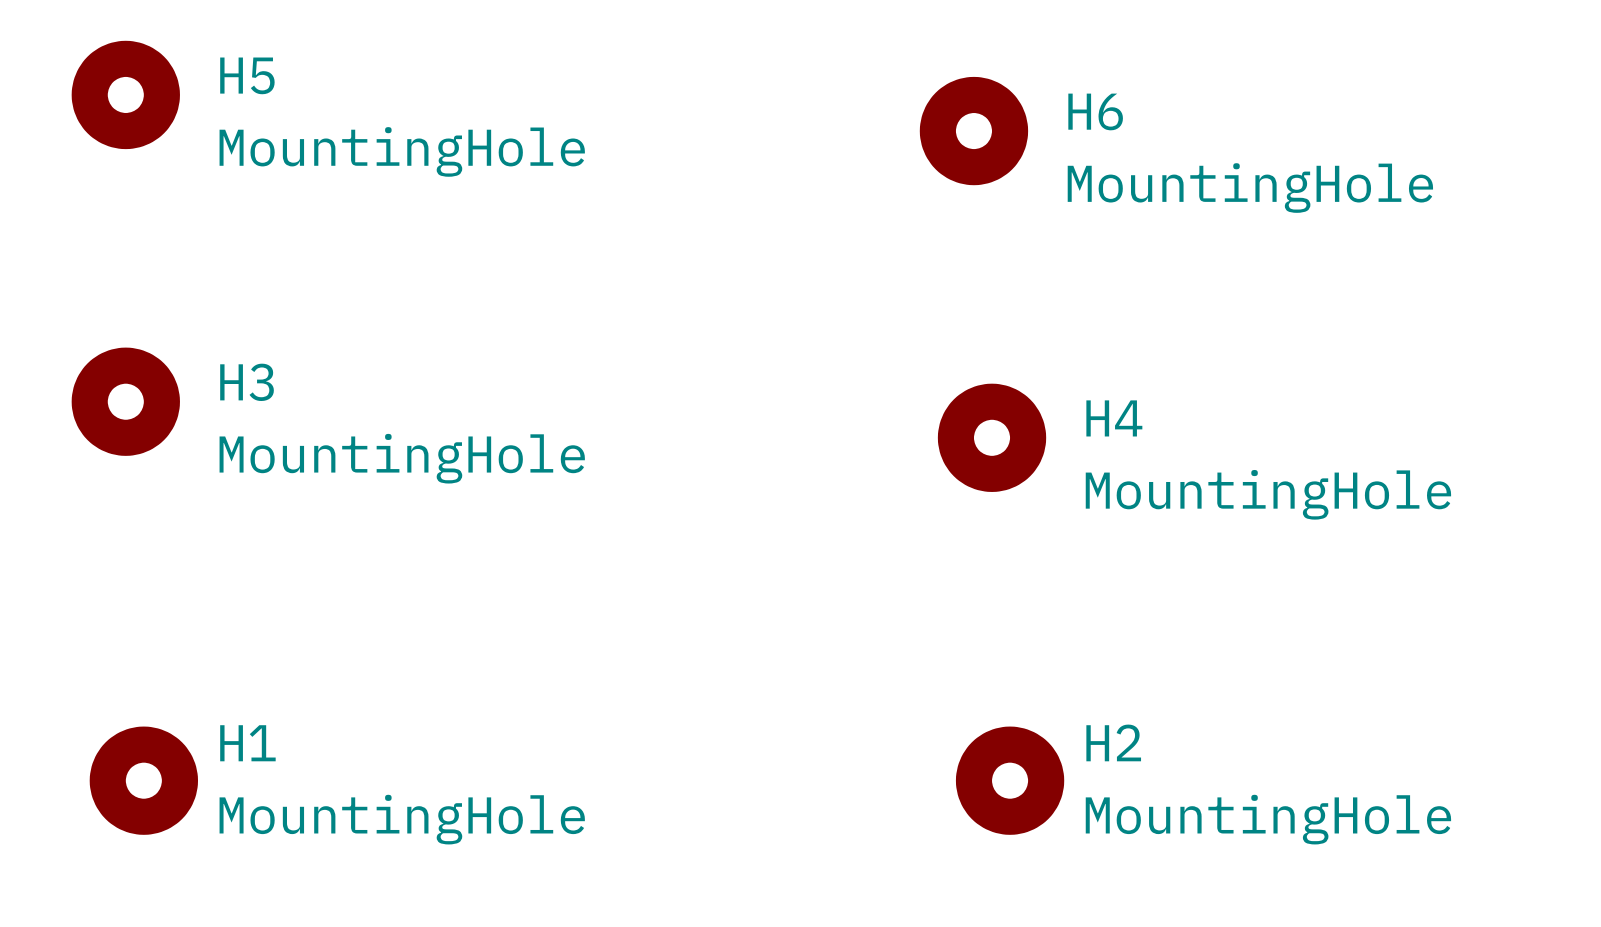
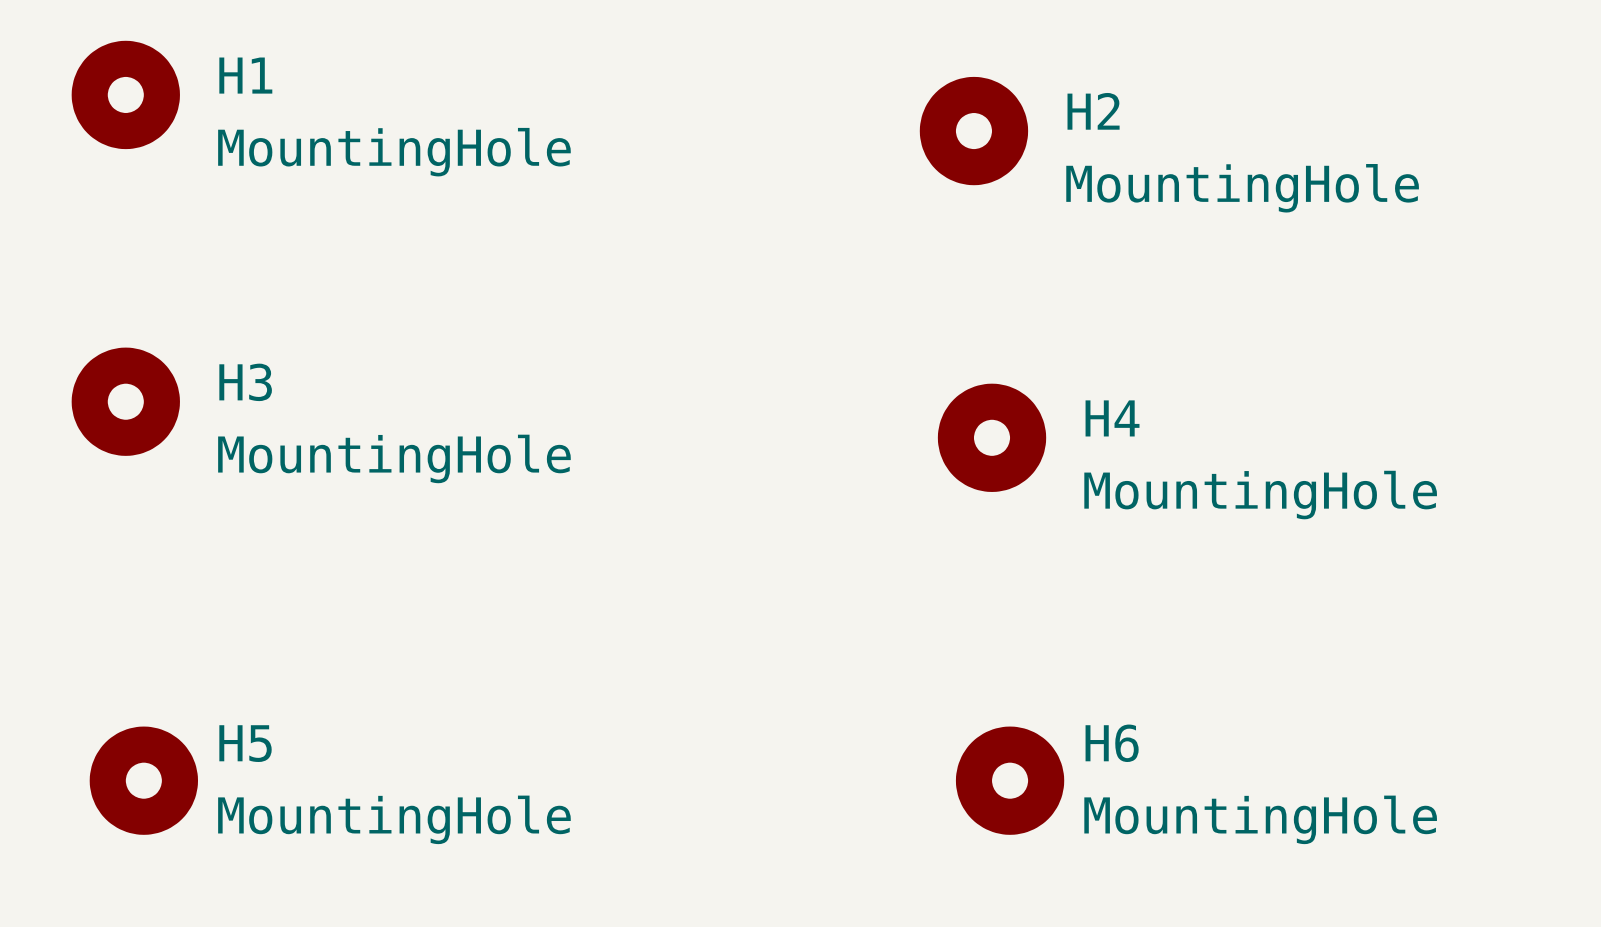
H5 name: H5 (247, 75) -> H1 (245, 75)
H6 name: H6 (1095, 111) -> H2 (1093, 111)
H2 name: H2 (1113, 742) -> H6 (1112, 743)
H1 name: H1 (247, 743) -> H5 (245, 743)

